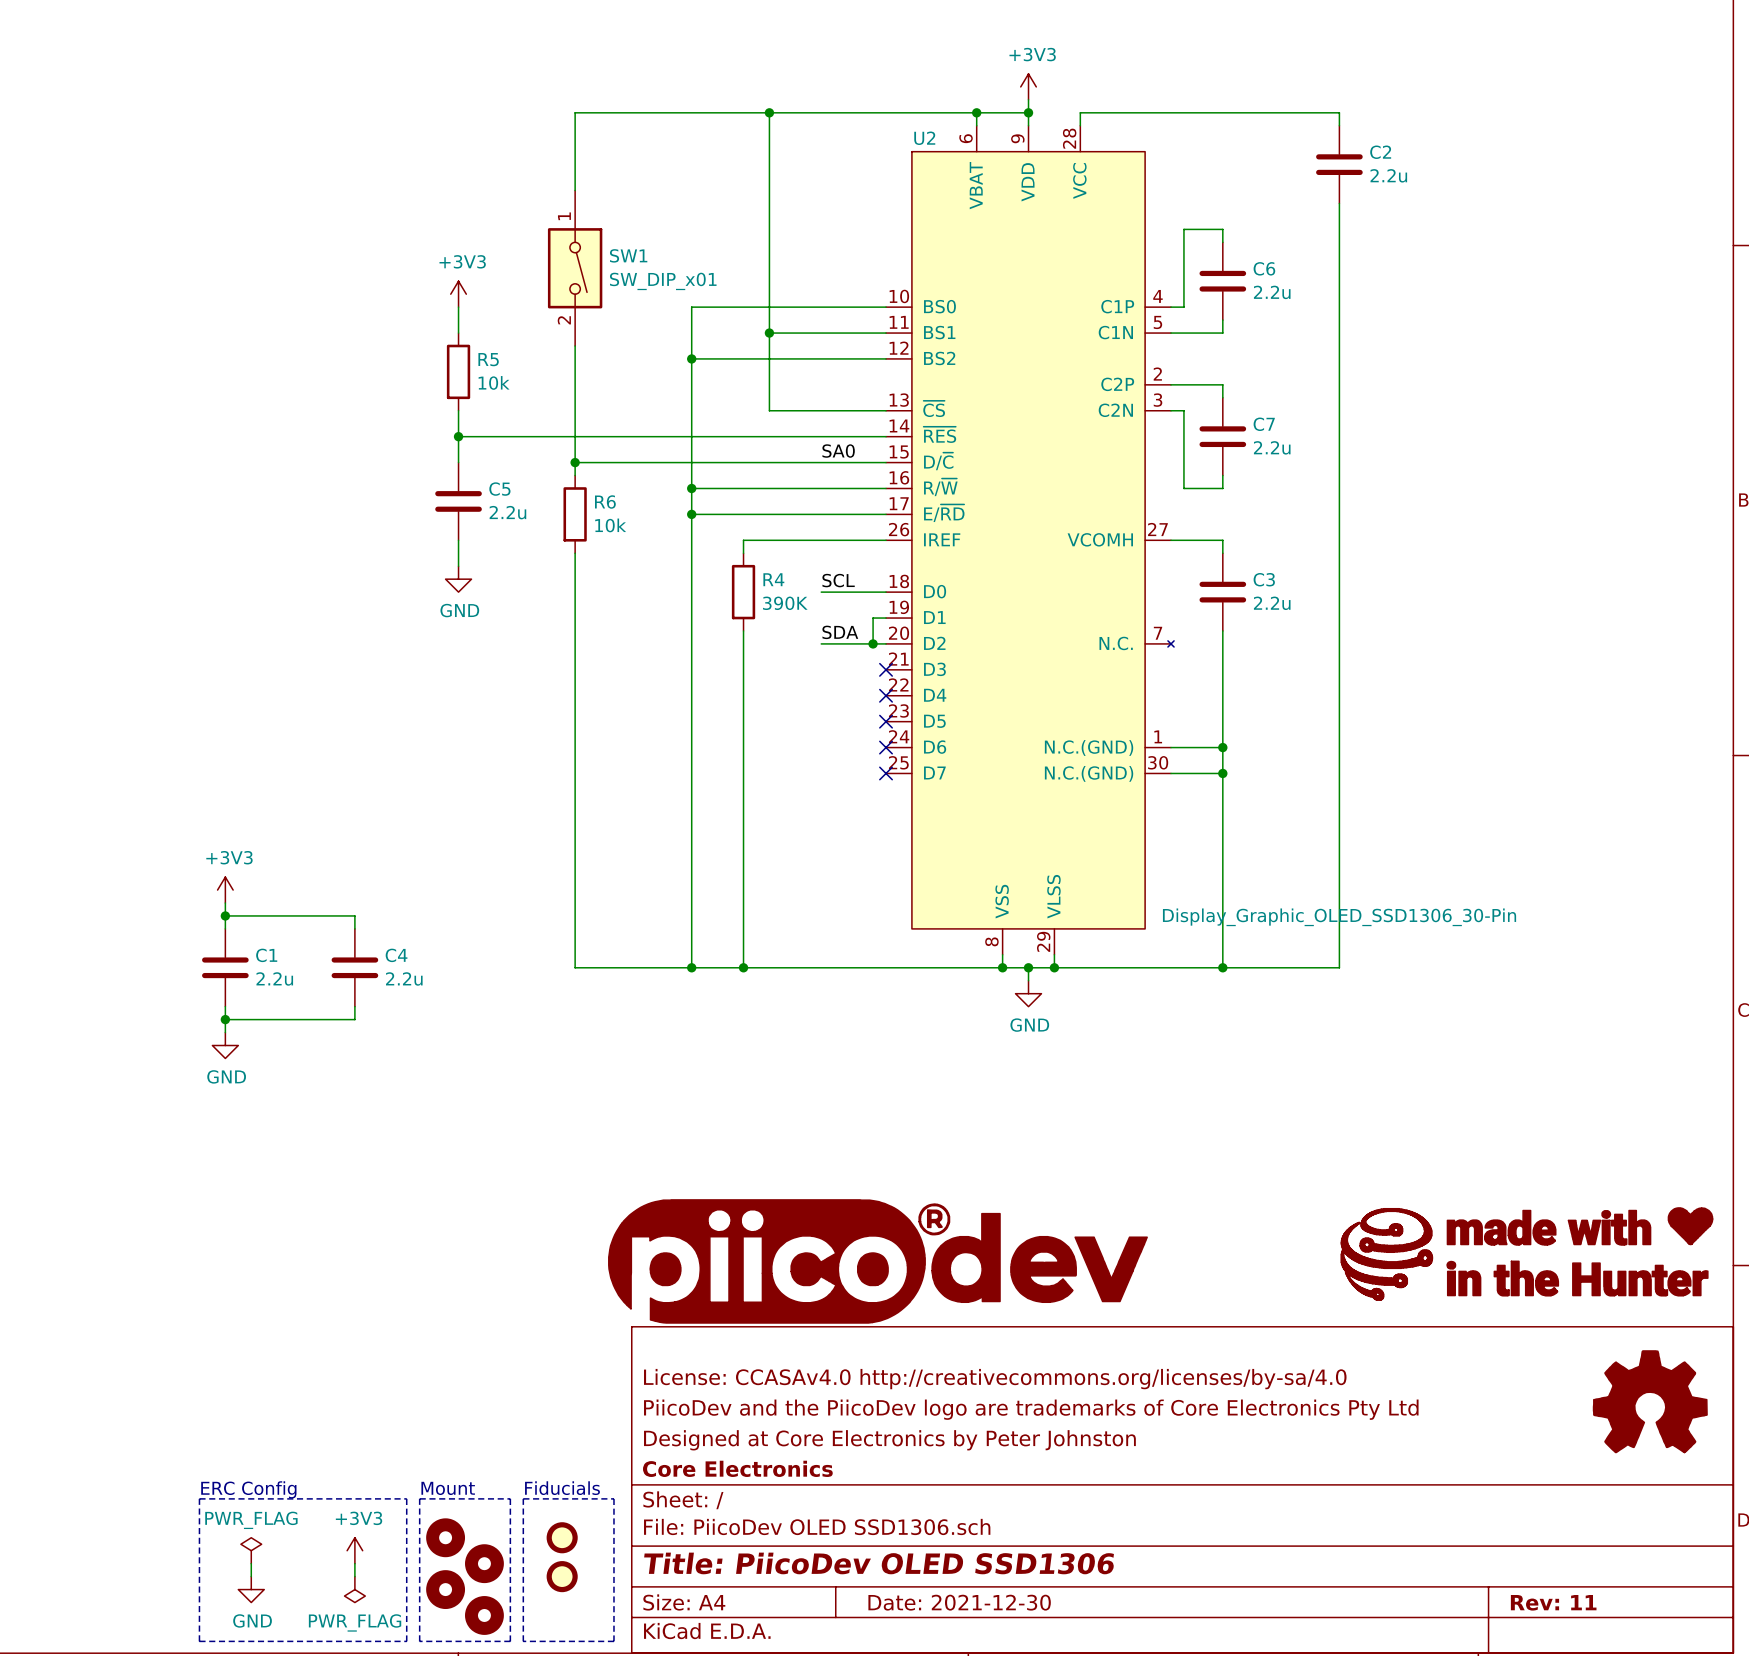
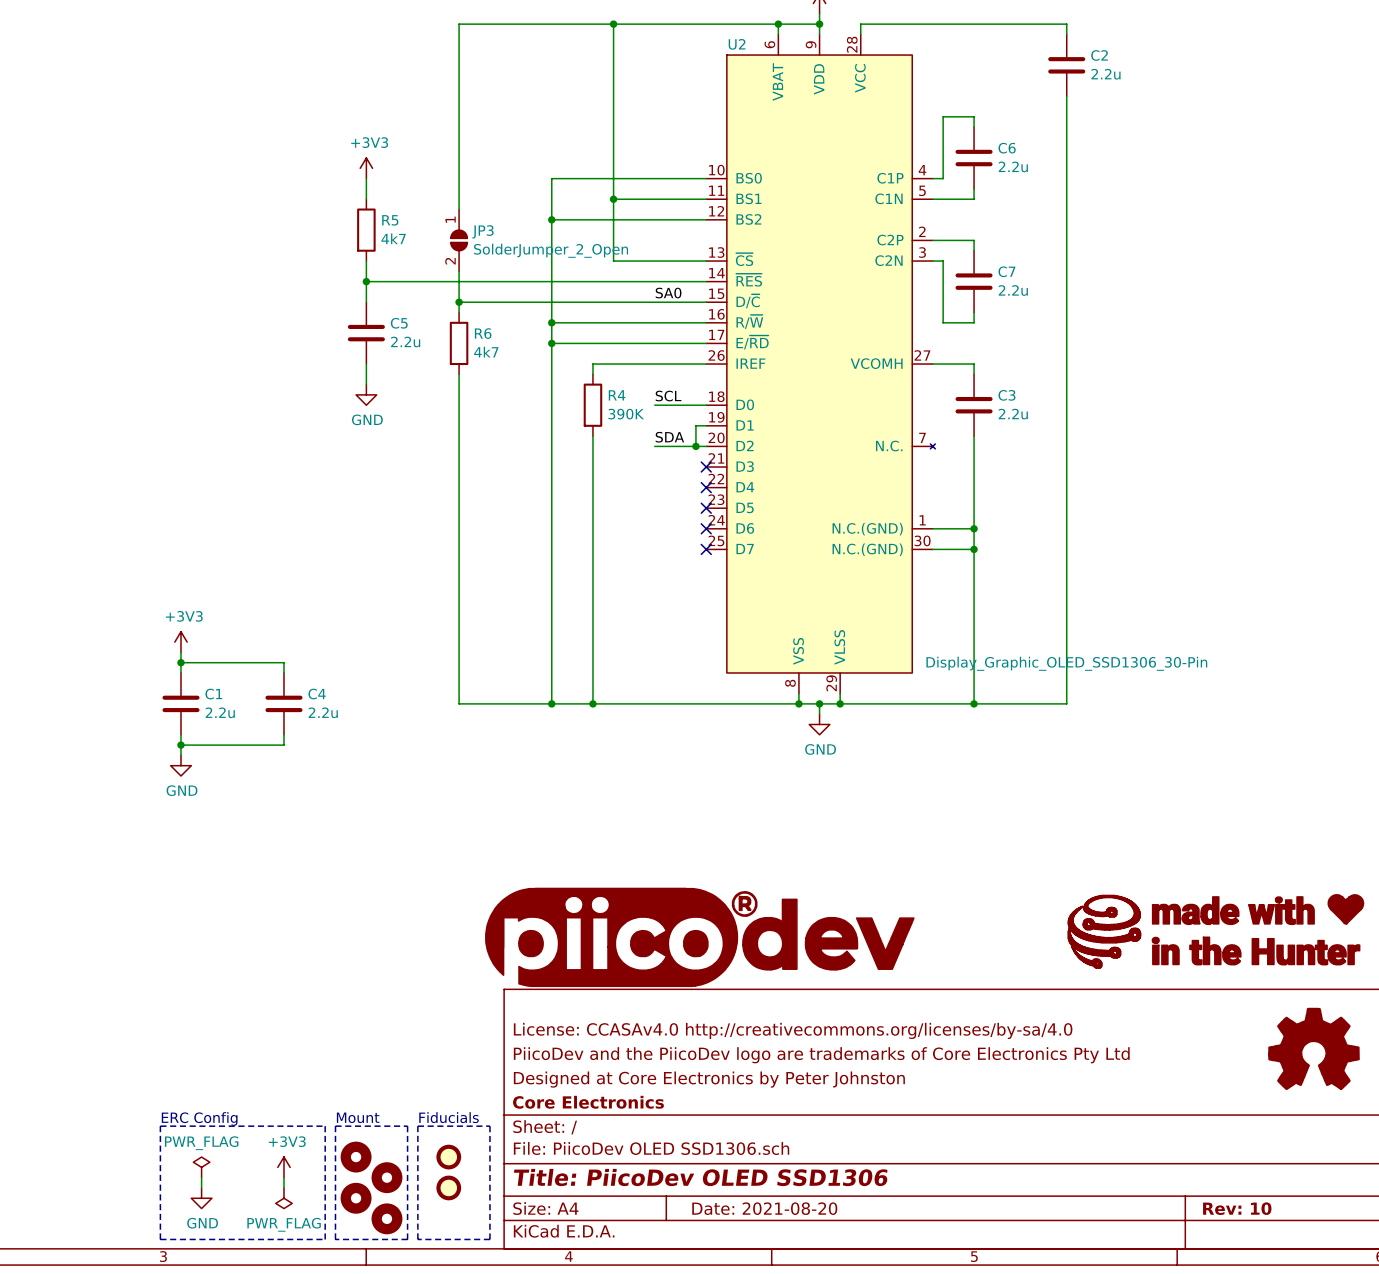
SW1: SW_DIP_x01 (575, 268) -> none
R5 value: 10k (494, 382) -> 4k7 (393, 238)
JP3: none -> SolderJumper_2_Open (459, 240)
R6 value: 10k (610, 525) -> 4k7 (486, 352)
title block: Date: 2021-12-30 (959, 1602) -> Date: 2021-08-20 (764, 1208)
title block: Rev: 11 (1553, 1602) -> Rev: 10 (1237, 1208)

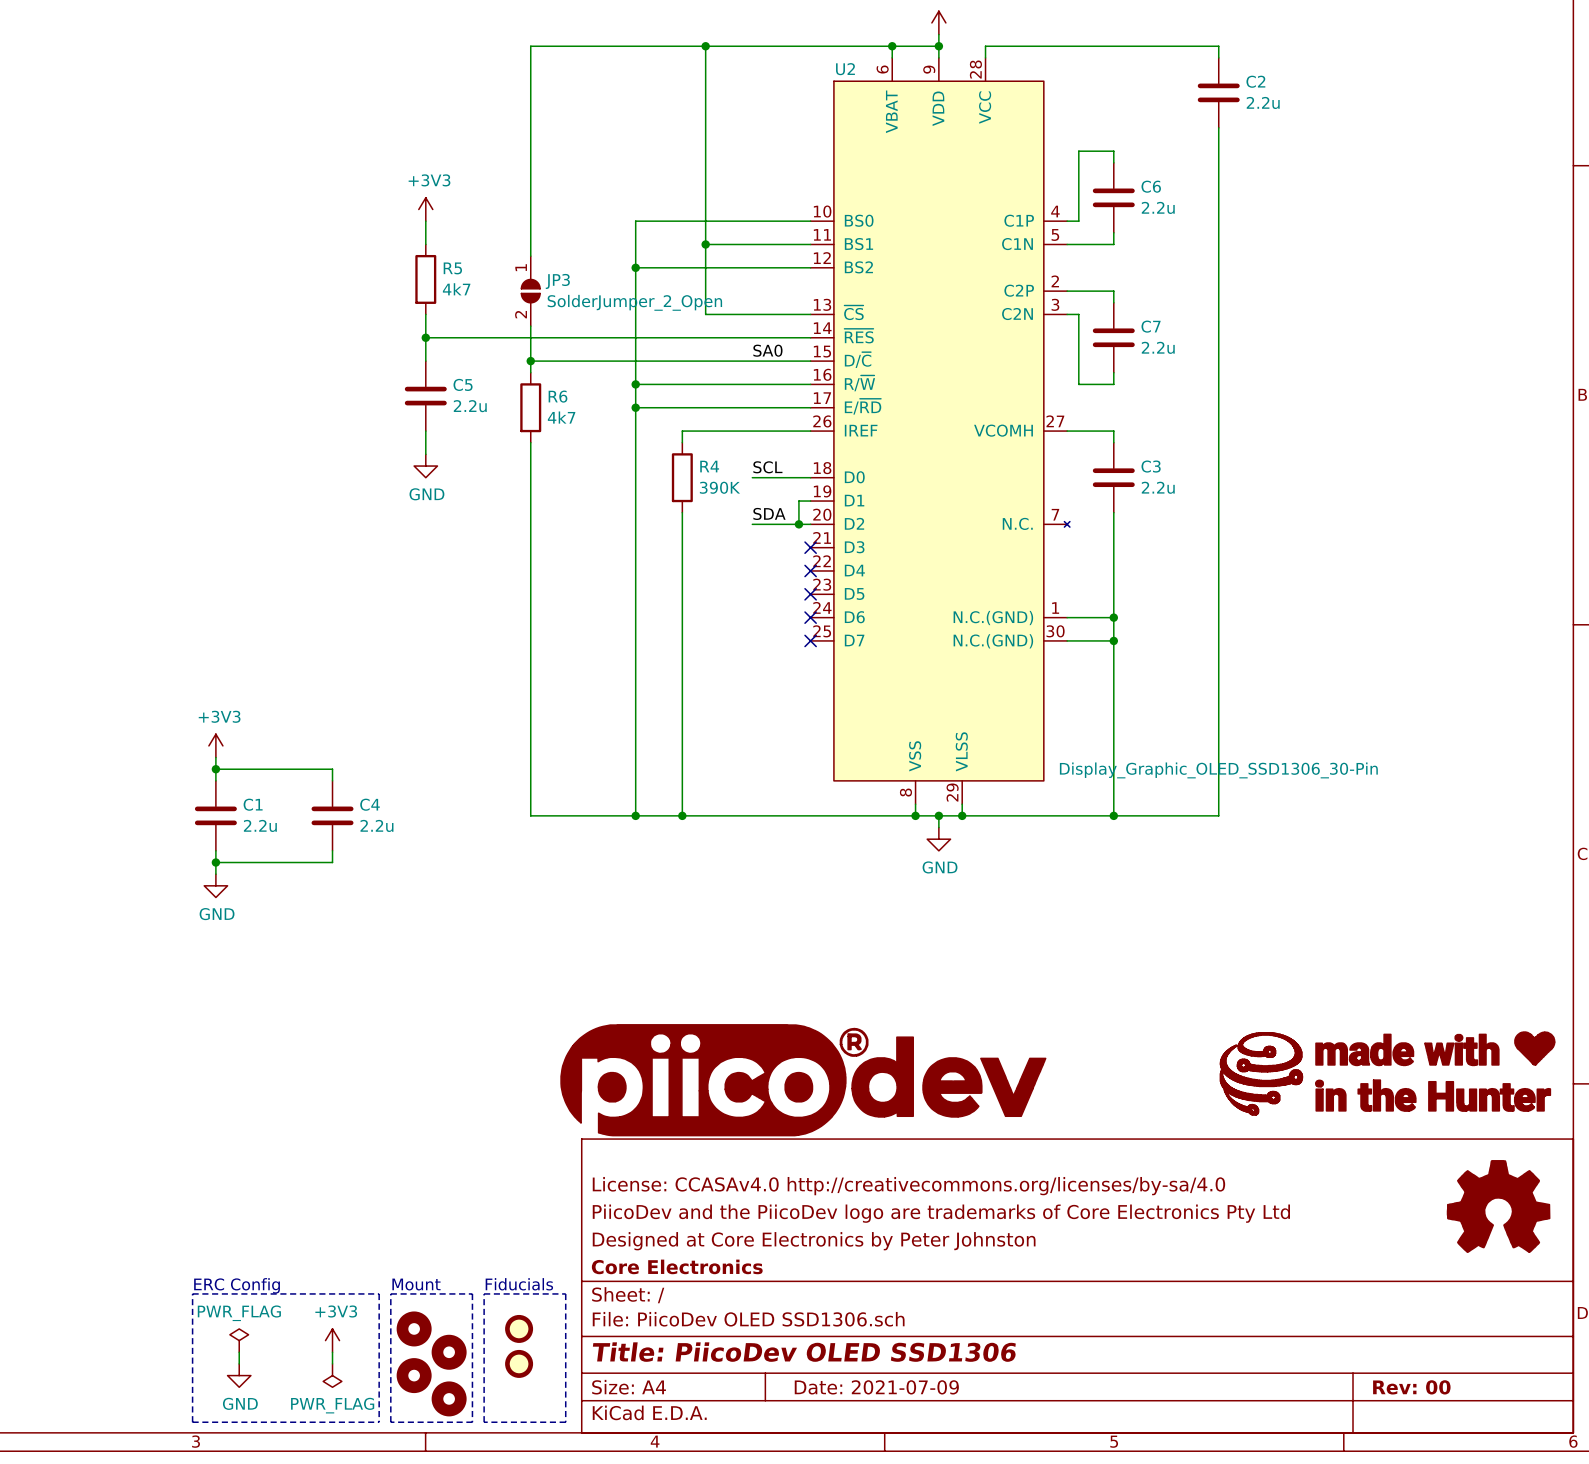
title block: Date: 2021-08-20 (764, 1208) -> Date: 2021-07-09 (876, 1387)
title block: Rev: 10 (1237, 1208) -> Rev: 00 (1411, 1387)

